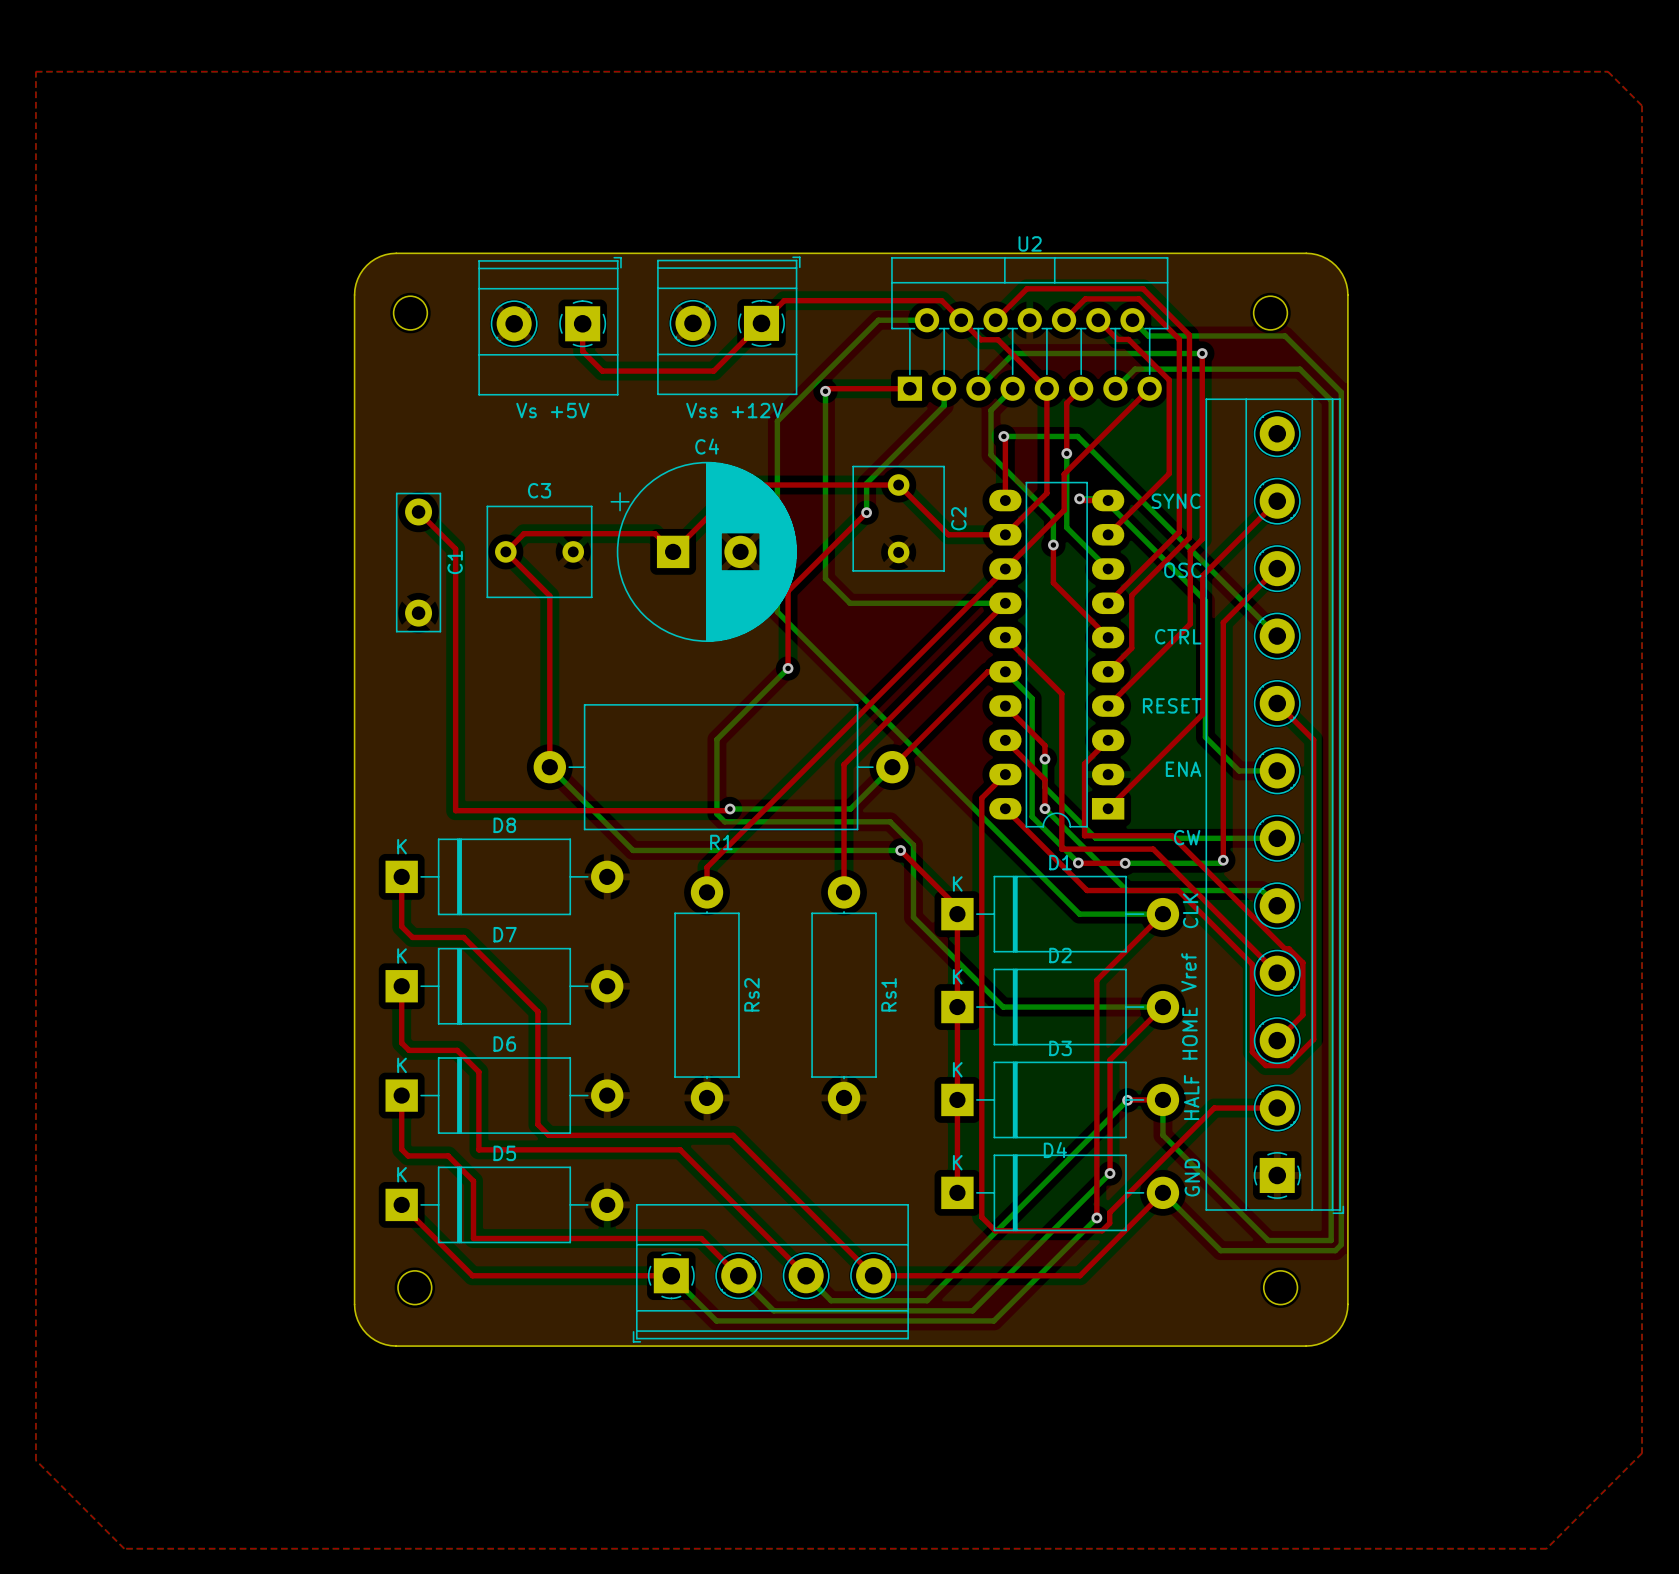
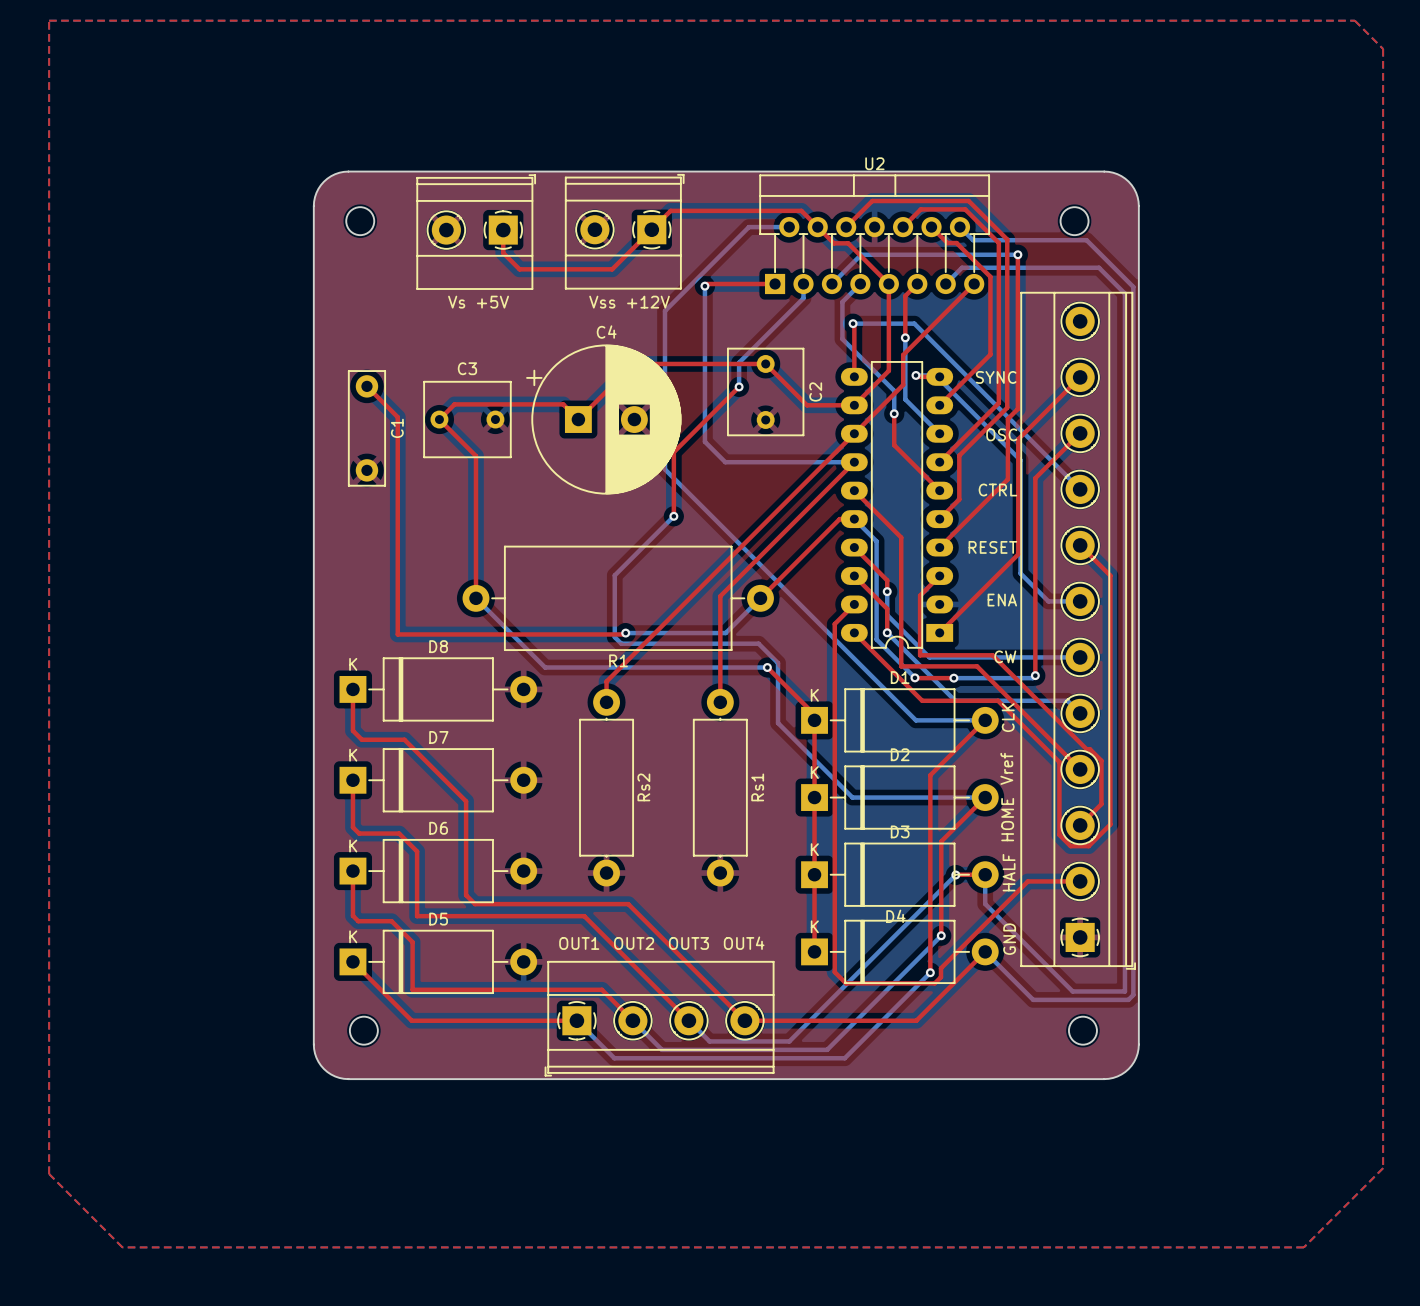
text: none -> OUT1 (579, 943)
text: none -> OUT2 (634, 943)
text: none -> OUT3 (688, 943)
text: none -> OUT4 (744, 943)

